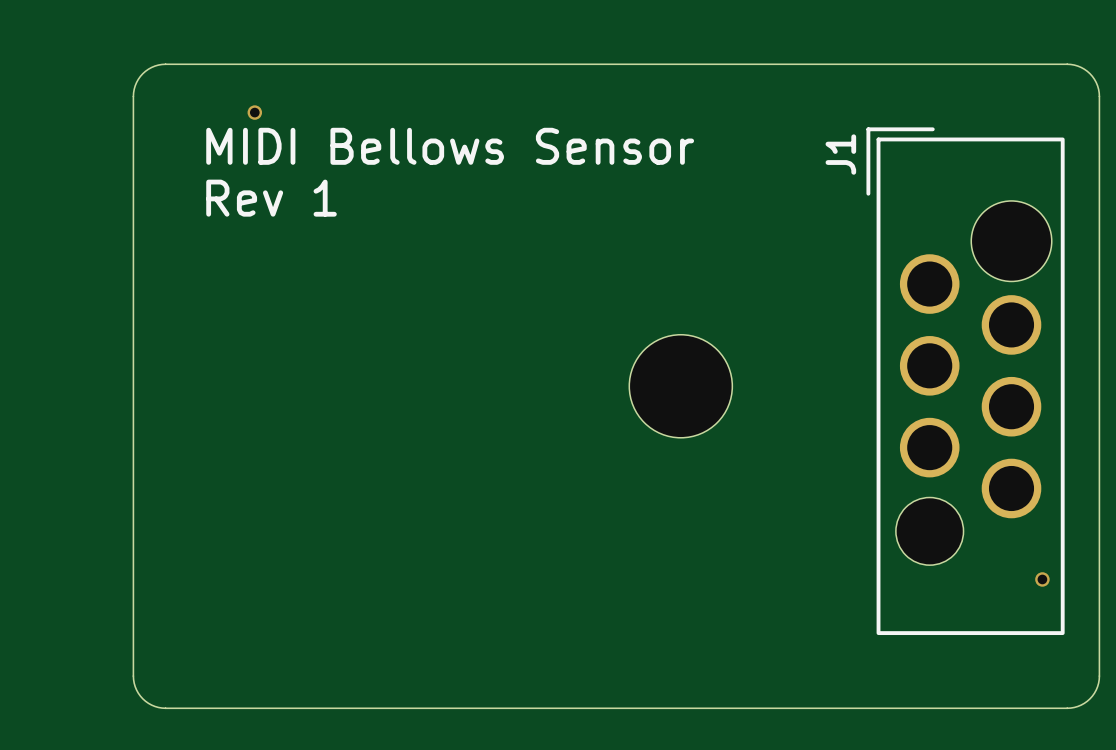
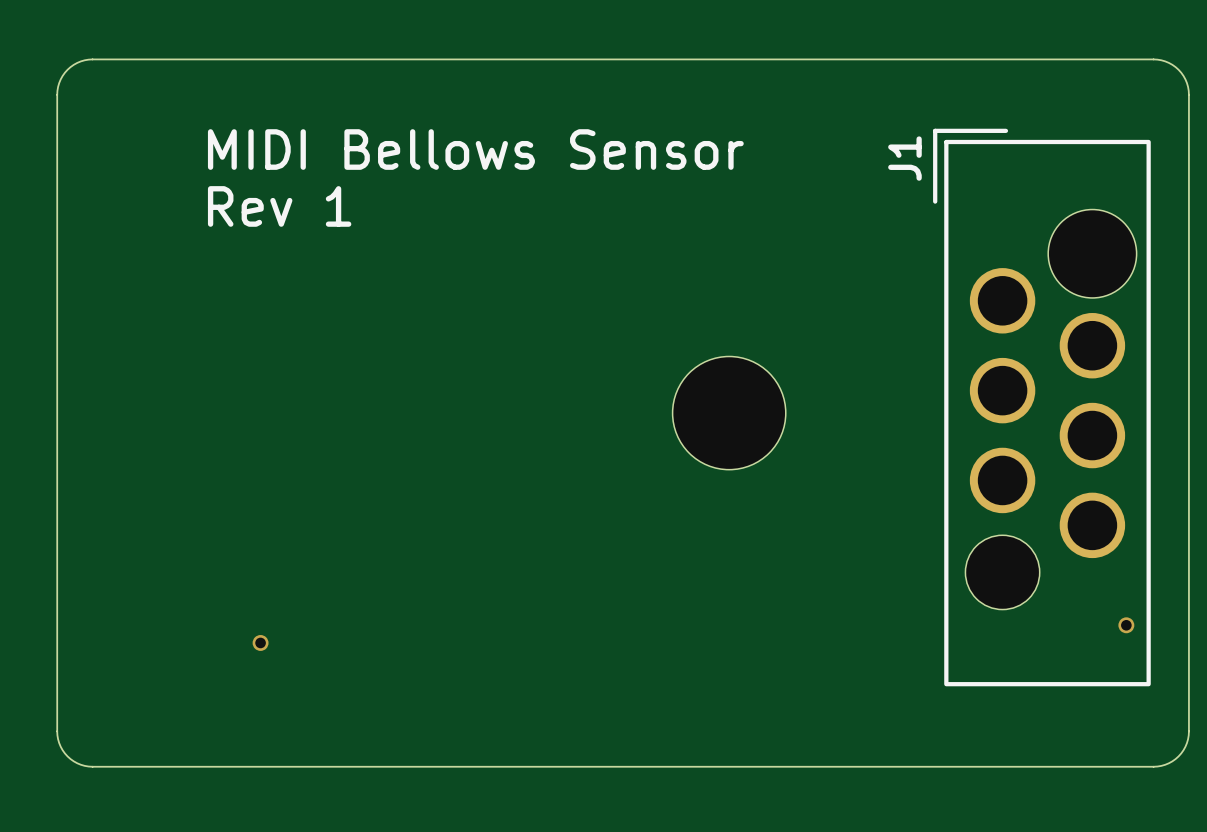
board edge: (165, 64) (154, 66) (142, 73) (136, 82) (133, 96) (133, 676) (135, 686) (142, 698) (151, 705) (165, 708) -> (163, 59) (92, 59) (80, 61) (64, 72) (59, 83) (57, 94) (57, 735) (64, 753) (80, 764) (92, 766) (163, 766)
via: (254, 112) -> none
via: none -> (260, 642)

